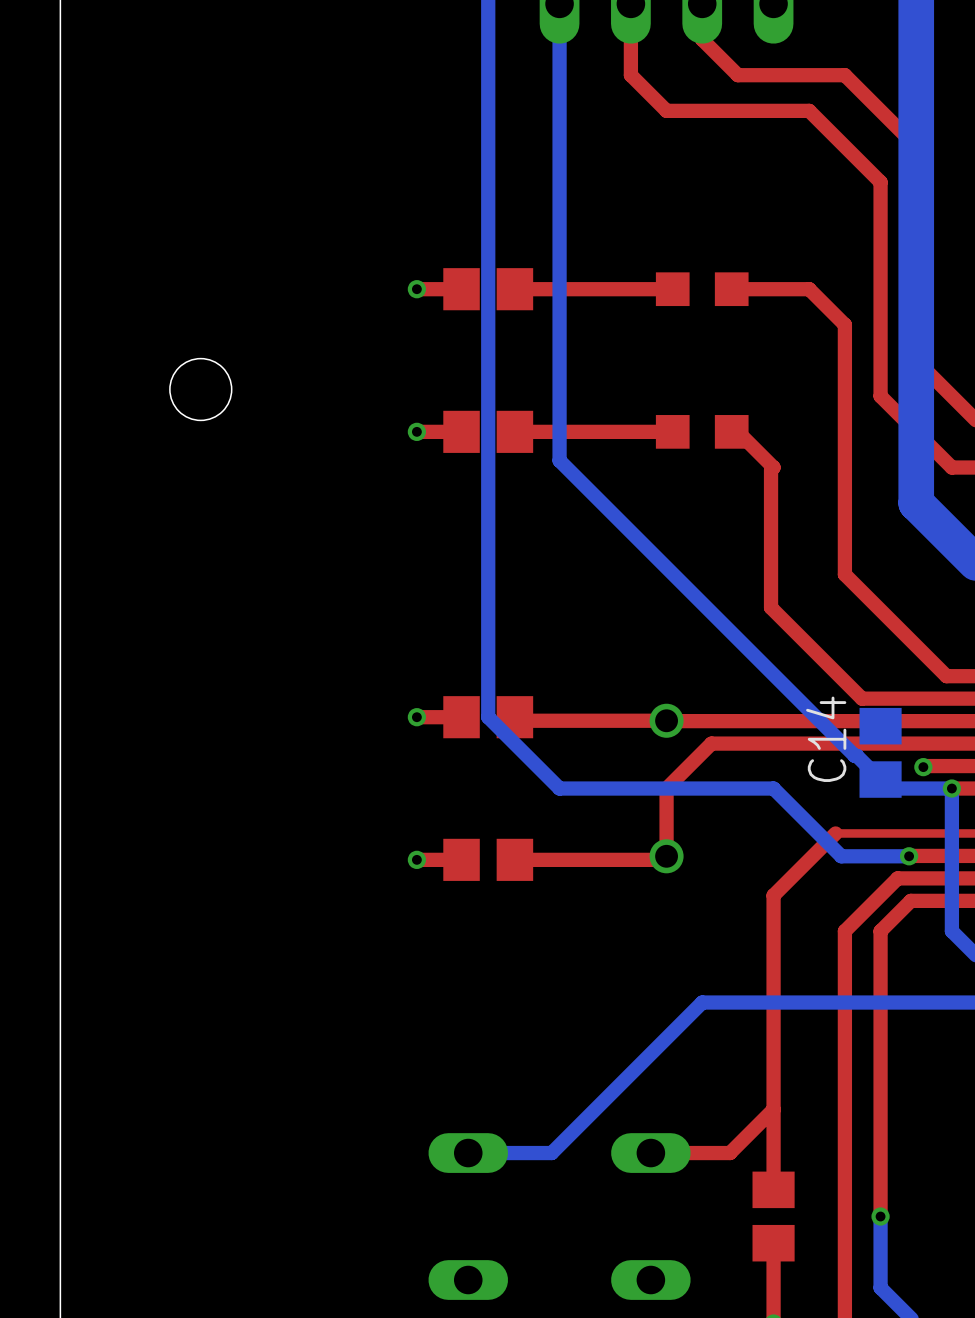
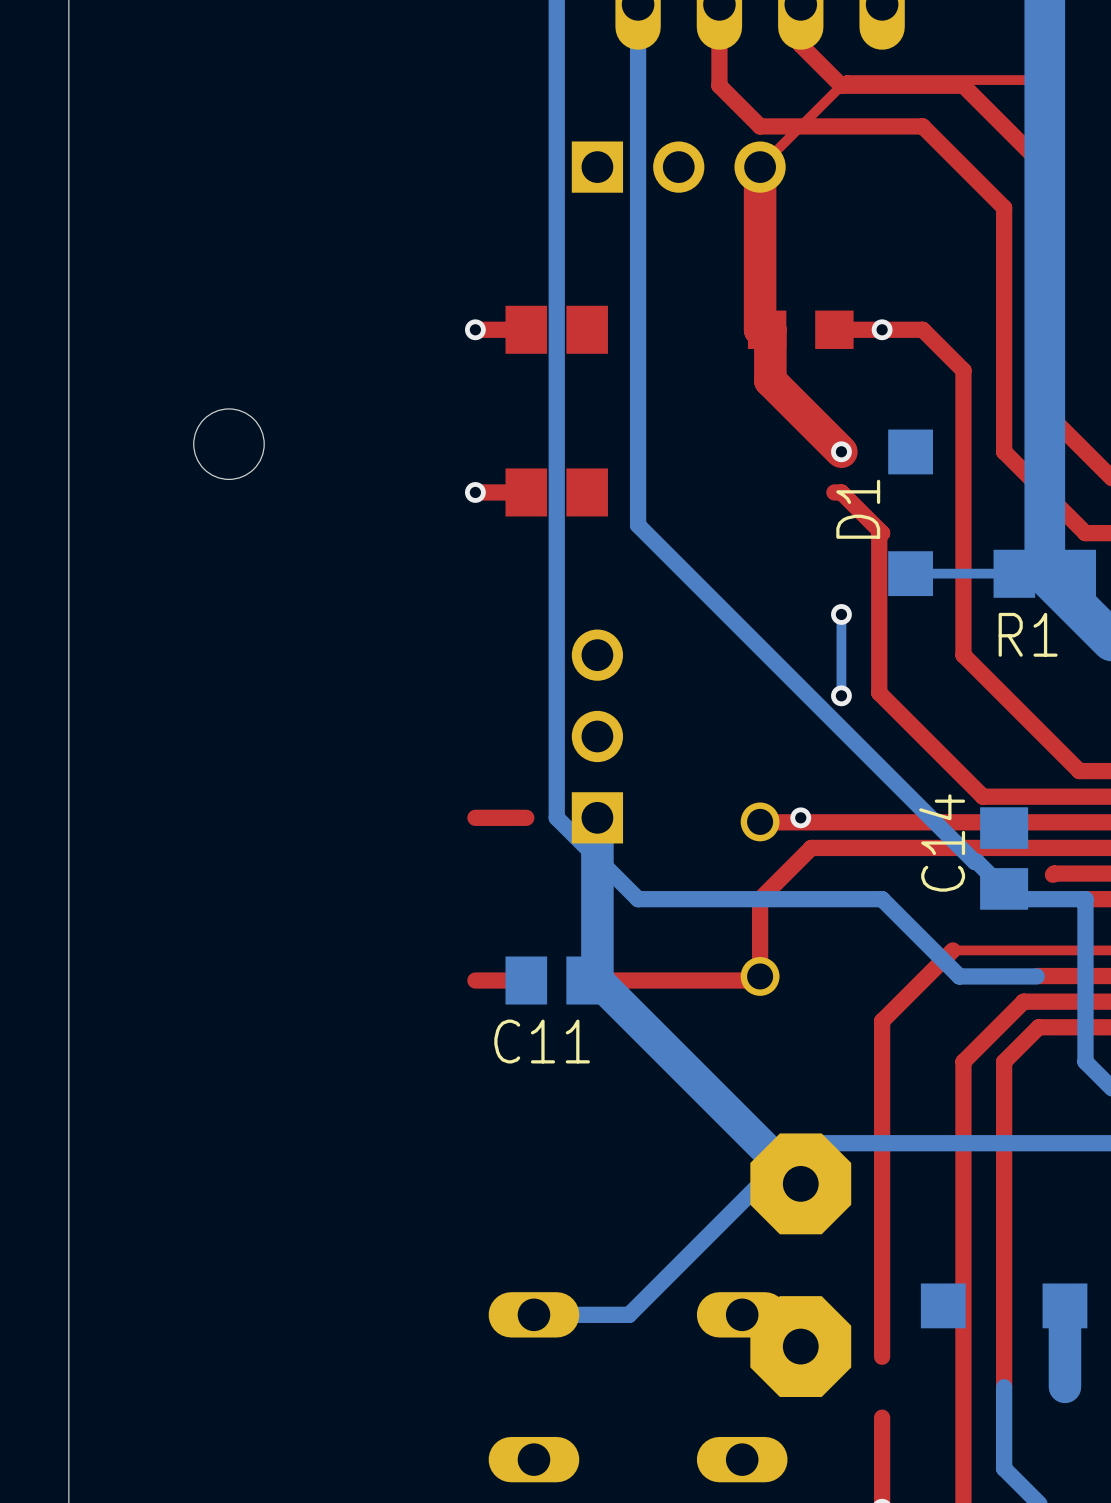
part: none -> (678, 167)
top track: (666, 289) (523, 289) -> (760, 329) (760, 167) (847, 80) (1033, 80)
top track: none -> (767, 329) (770, 329) (770, 380) (841, 451)
via: none -> (882, 329)
via: none -> (841, 451)
top track: (672, 431) (523, 431) -> none
part: (702, 431) -> none
D1: none -> (910, 512)
bottom track: none -> (1014, 573) (910, 573)
R1: none -> (1044, 573)
bottom track: none -> (841, 614) (841, 695)
via: none -> (841, 614)
via: none -> (841, 695)
part: none -> (597, 736)
via: (416, 717) -> none
part: (488, 717) -> none
top track: (514, 717) (518, 720) (666, 720) -> none
bottom track: none -> (597, 817) (597, 980)
via: none -> (800, 817)
via: (923, 767) -> none
via: (951, 788) -> none
via: (909, 856) -> none
via: (416, 859) -> none
part: (488, 859) -> none
C11: none -> (556, 980)
bottom track: none -> (597, 980) (800, 1183)
part: none -> (800, 1265)
top track: (773, 1109) (730, 1153) (650, 1153) -> none
part: none -> (1004, 1305)
bottom track: none -> (1064, 1305) (1064, 1386)
part: (773, 1216) -> none
via: (880, 1216) -> none

